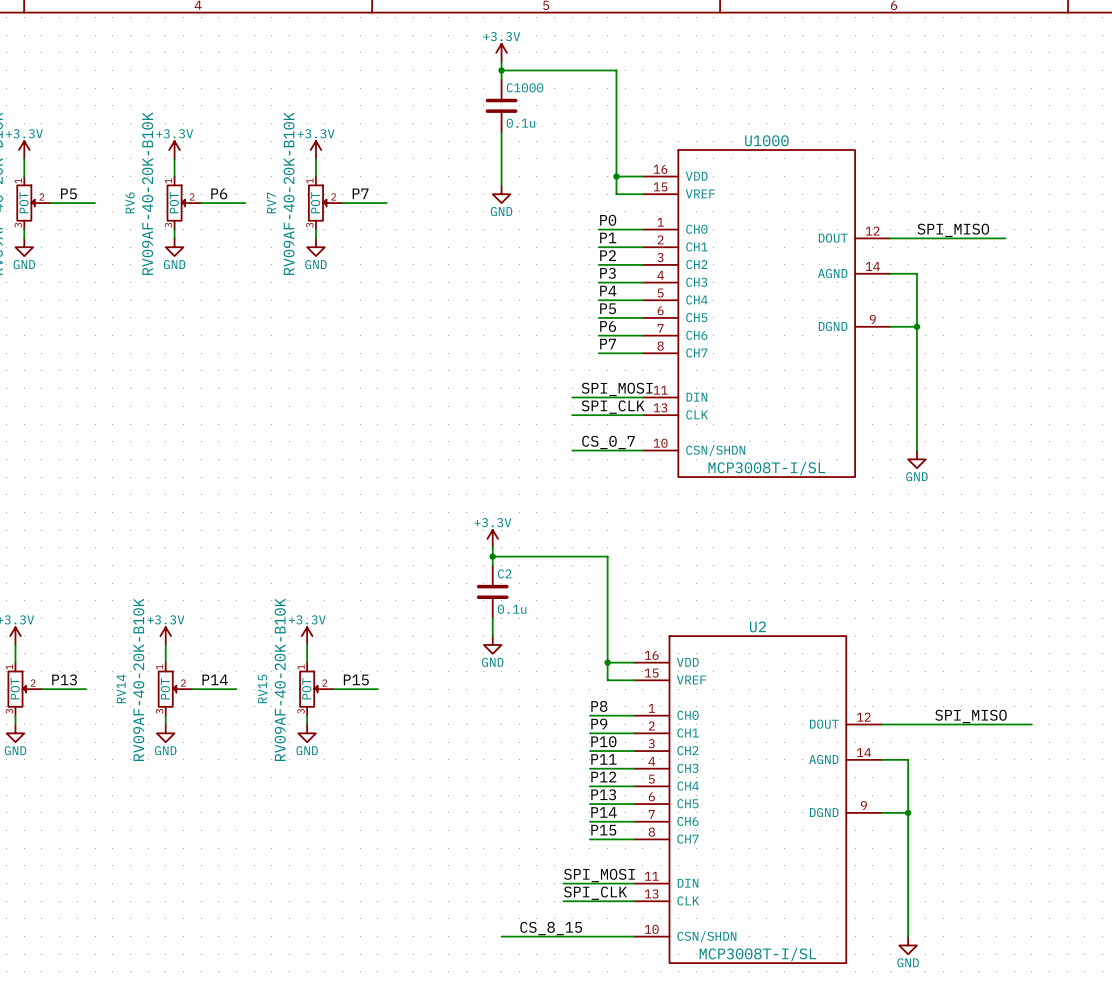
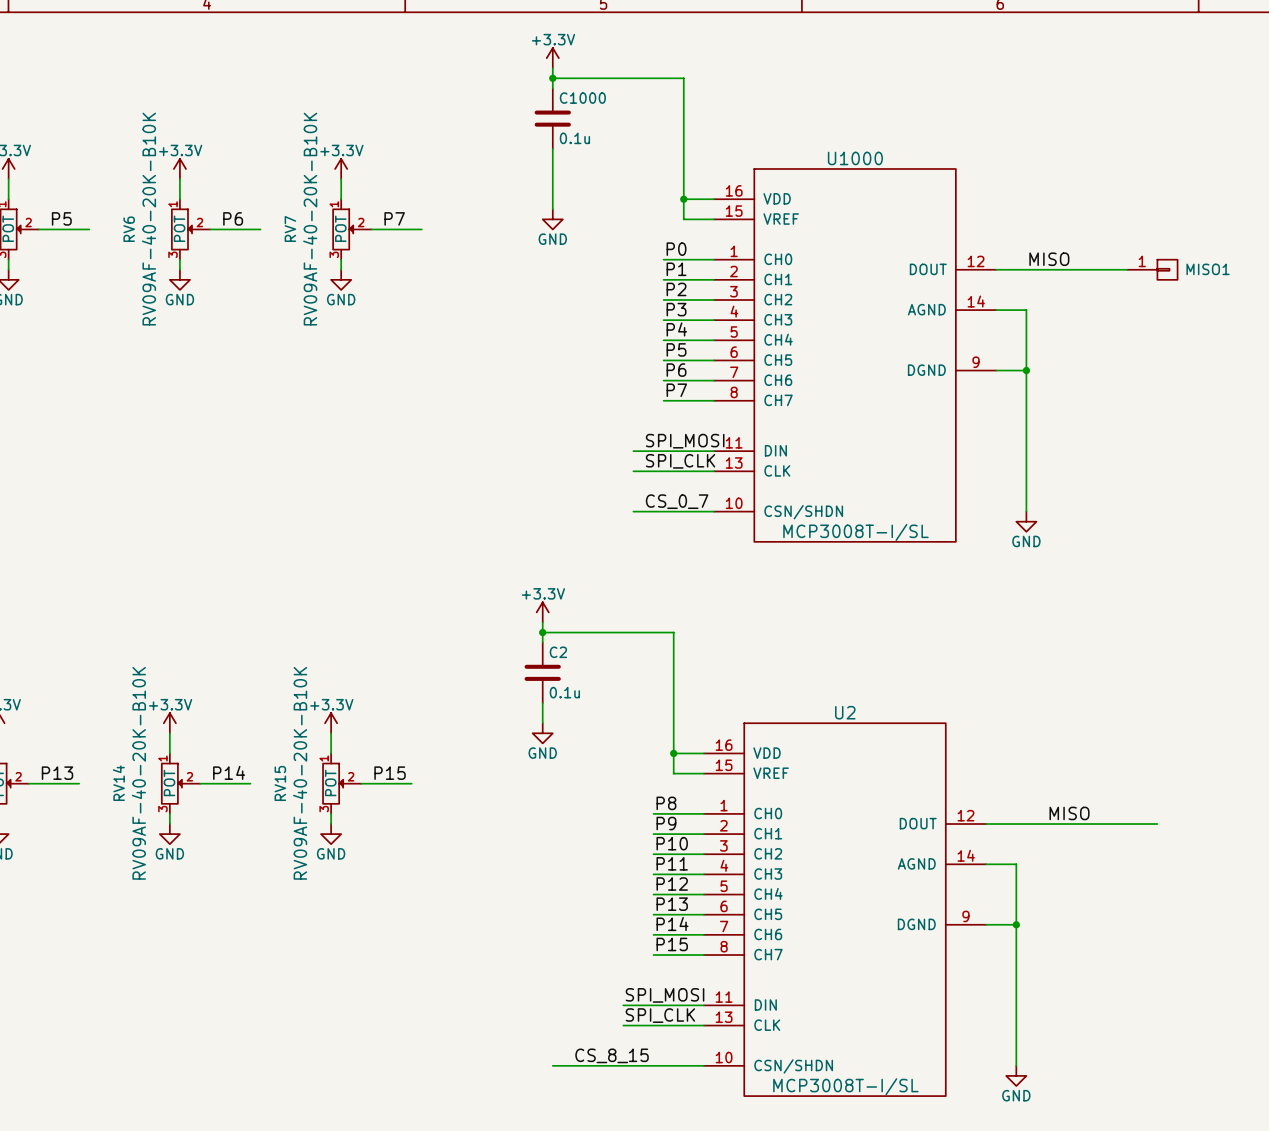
label: SPI_MISO (953, 230) -> MISO (1049, 259)
MISO1: none -> (1152, 269)
label: SPI_MISO (971, 716) -> MISO (1069, 813)

